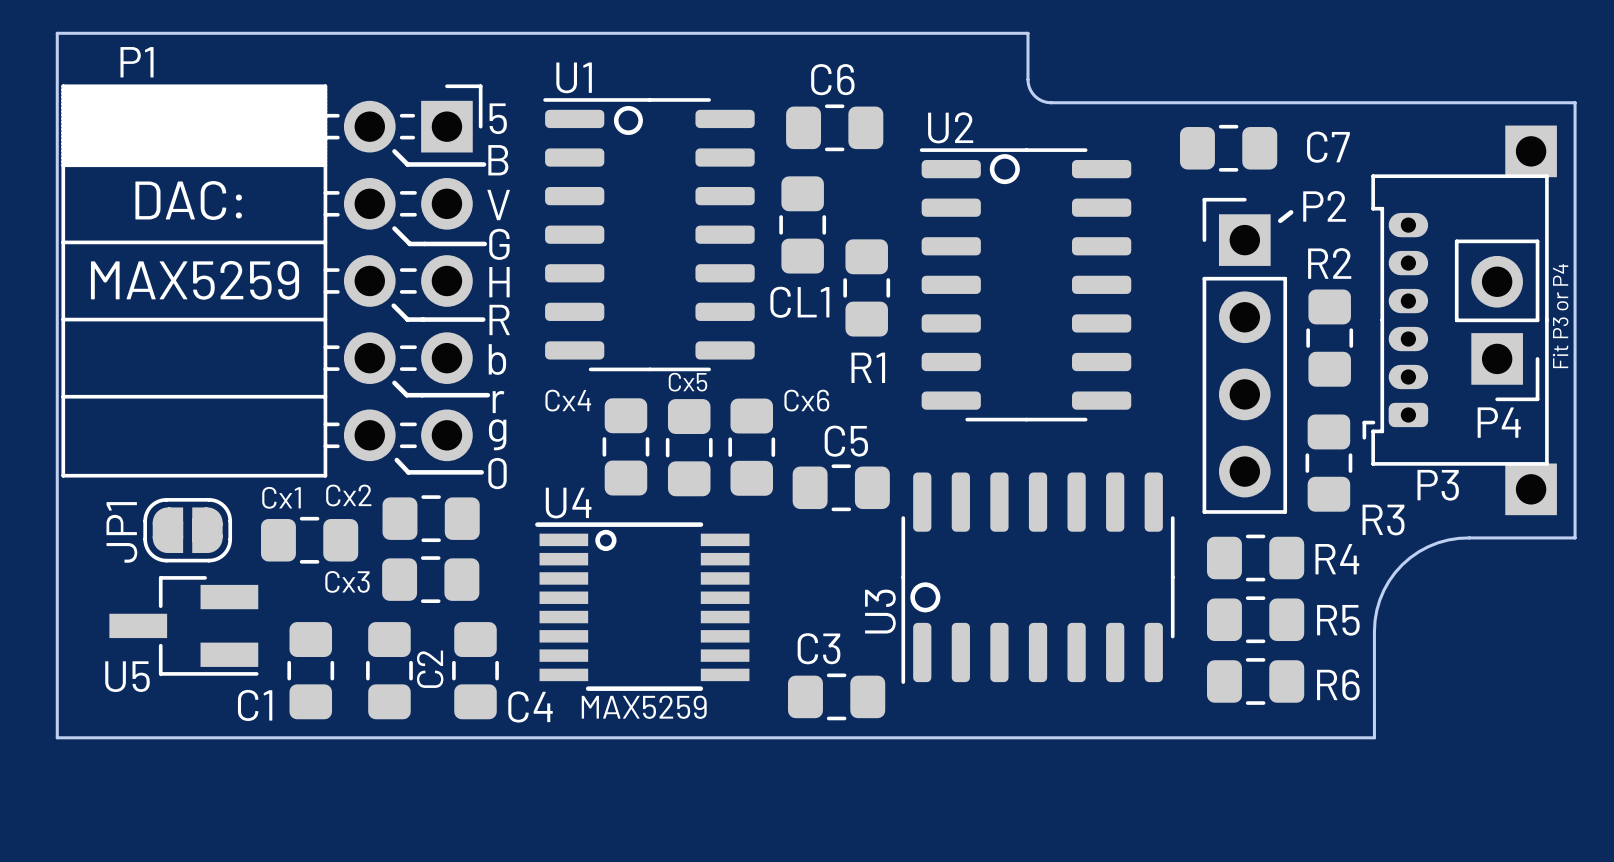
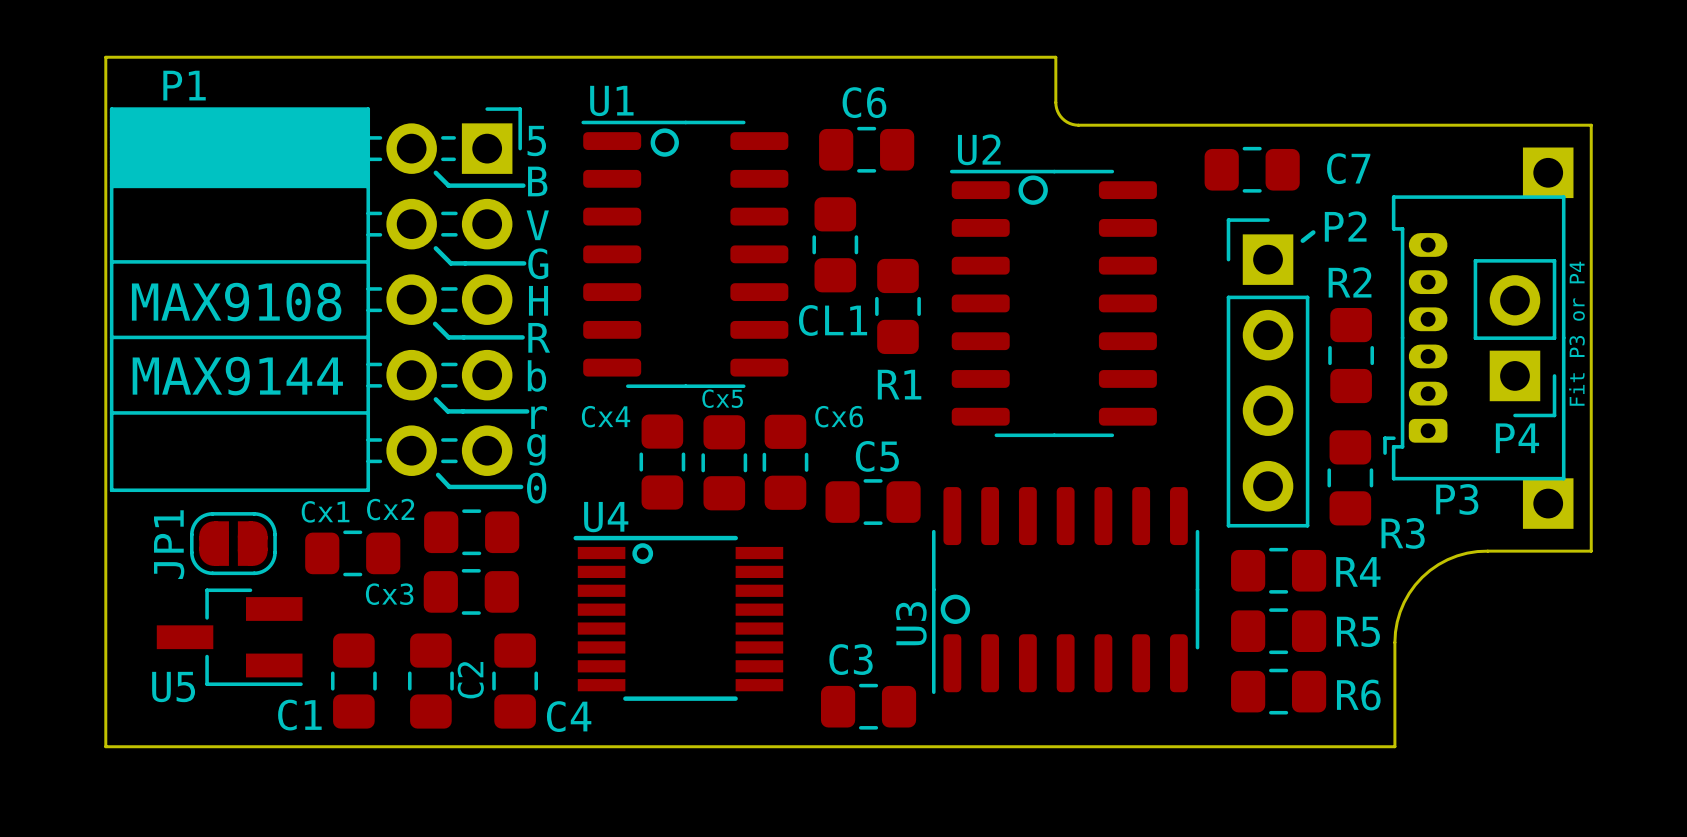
text: DAC: (188, 200) -> none
text: MAX5259 (195, 280) -> MAX9108 (236, 302)
text: none -> MAX9144 (237, 376)
text: MAX5259 (644, 707) -> none

